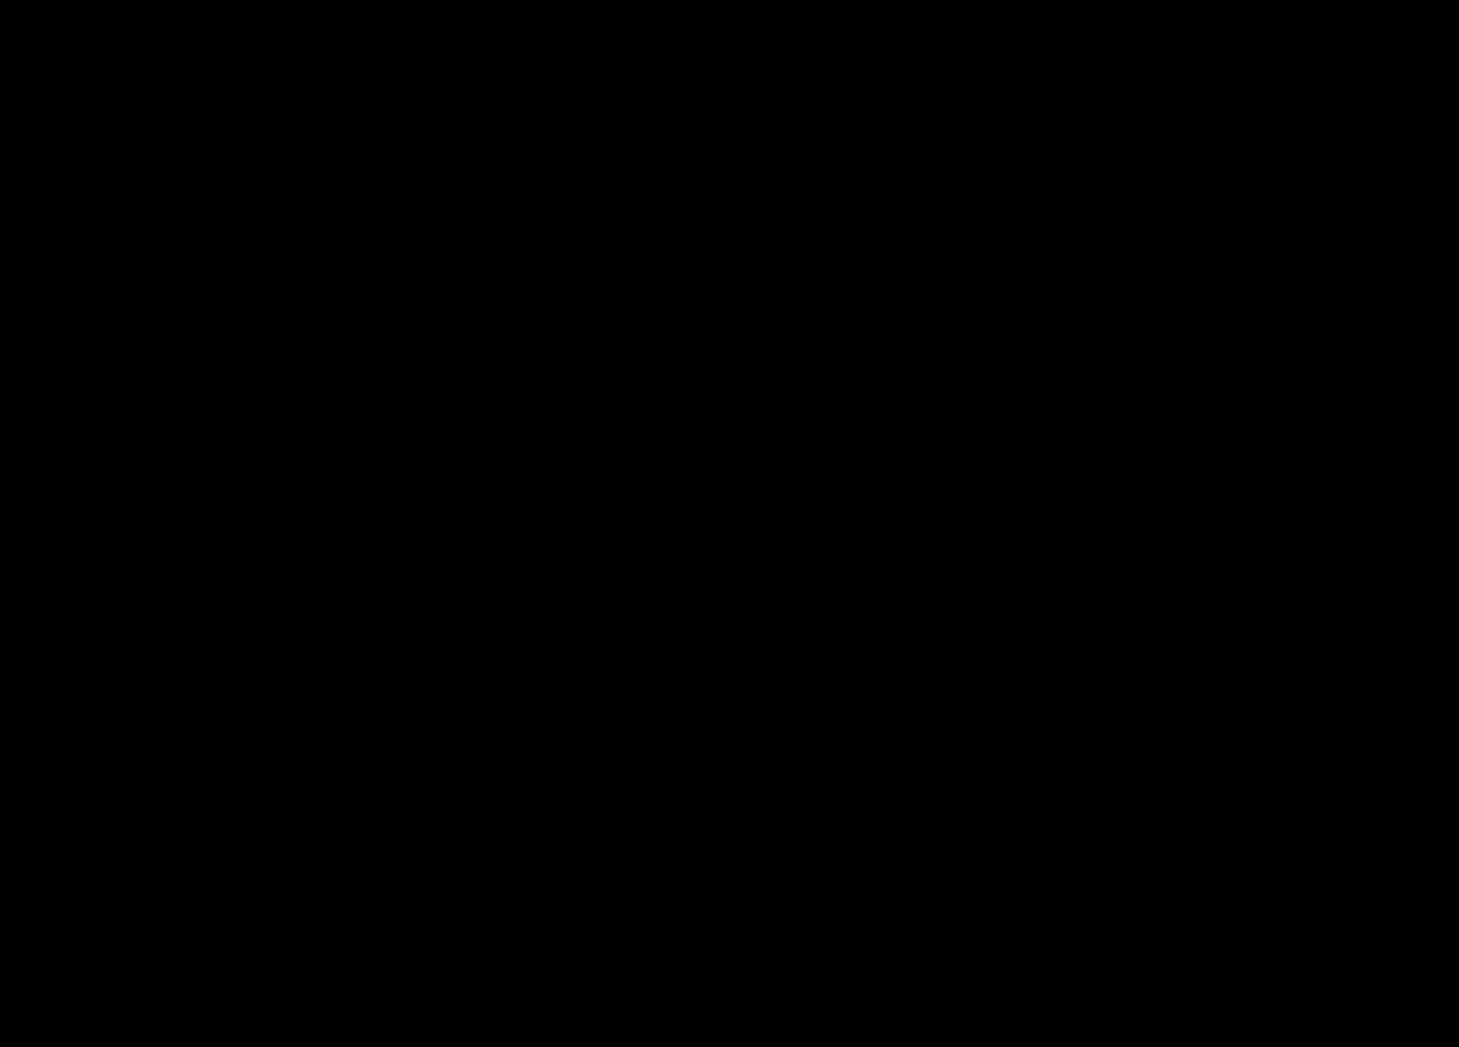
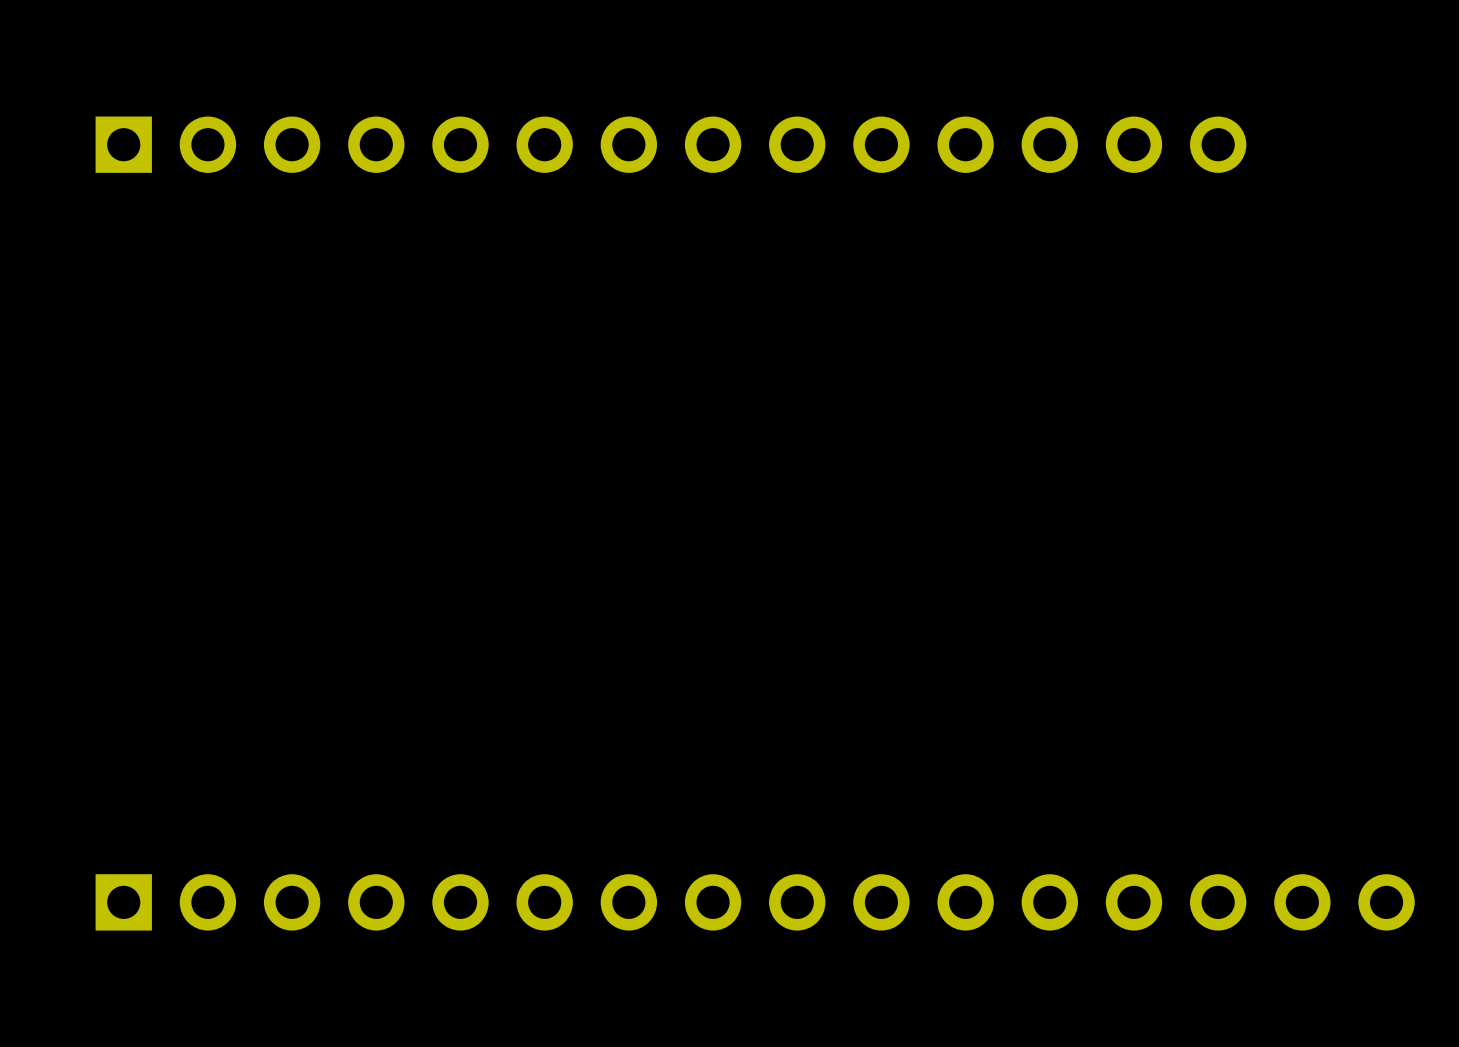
part: none -> (670, 144)
part: none -> (755, 902)

